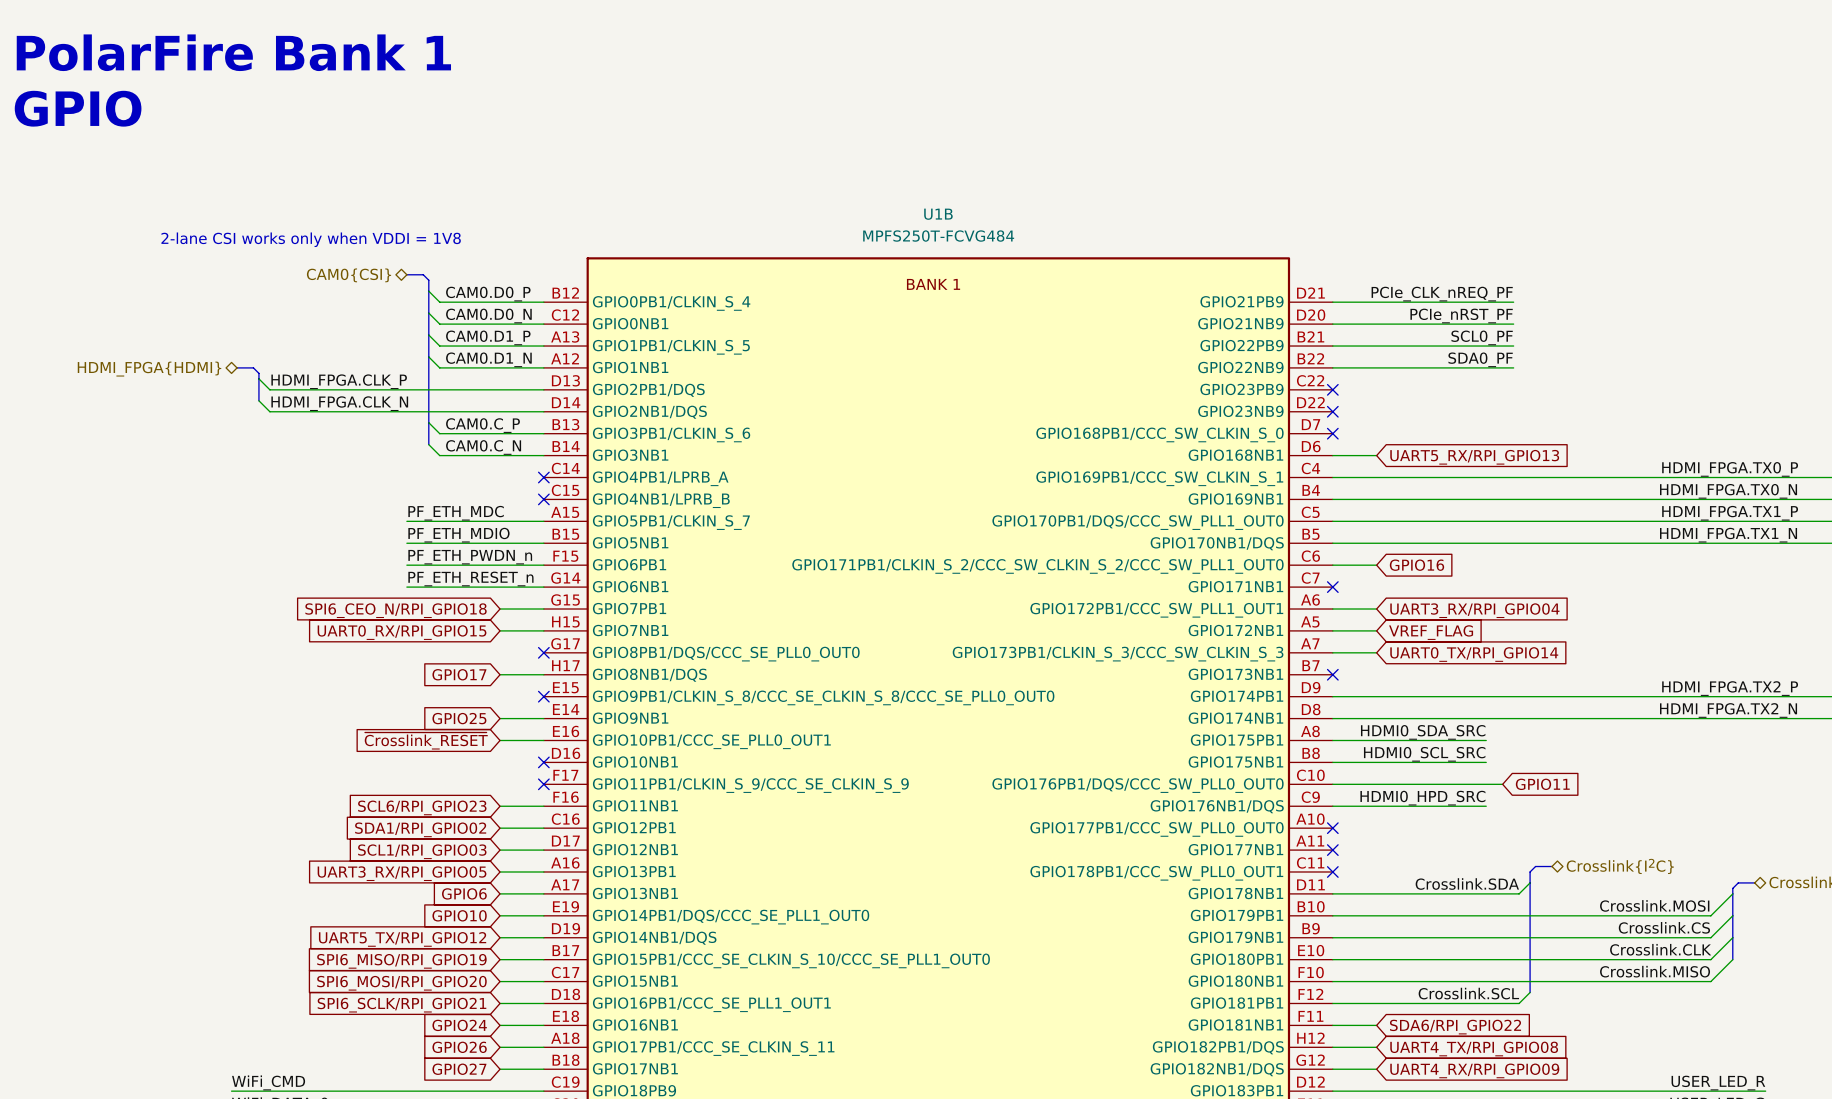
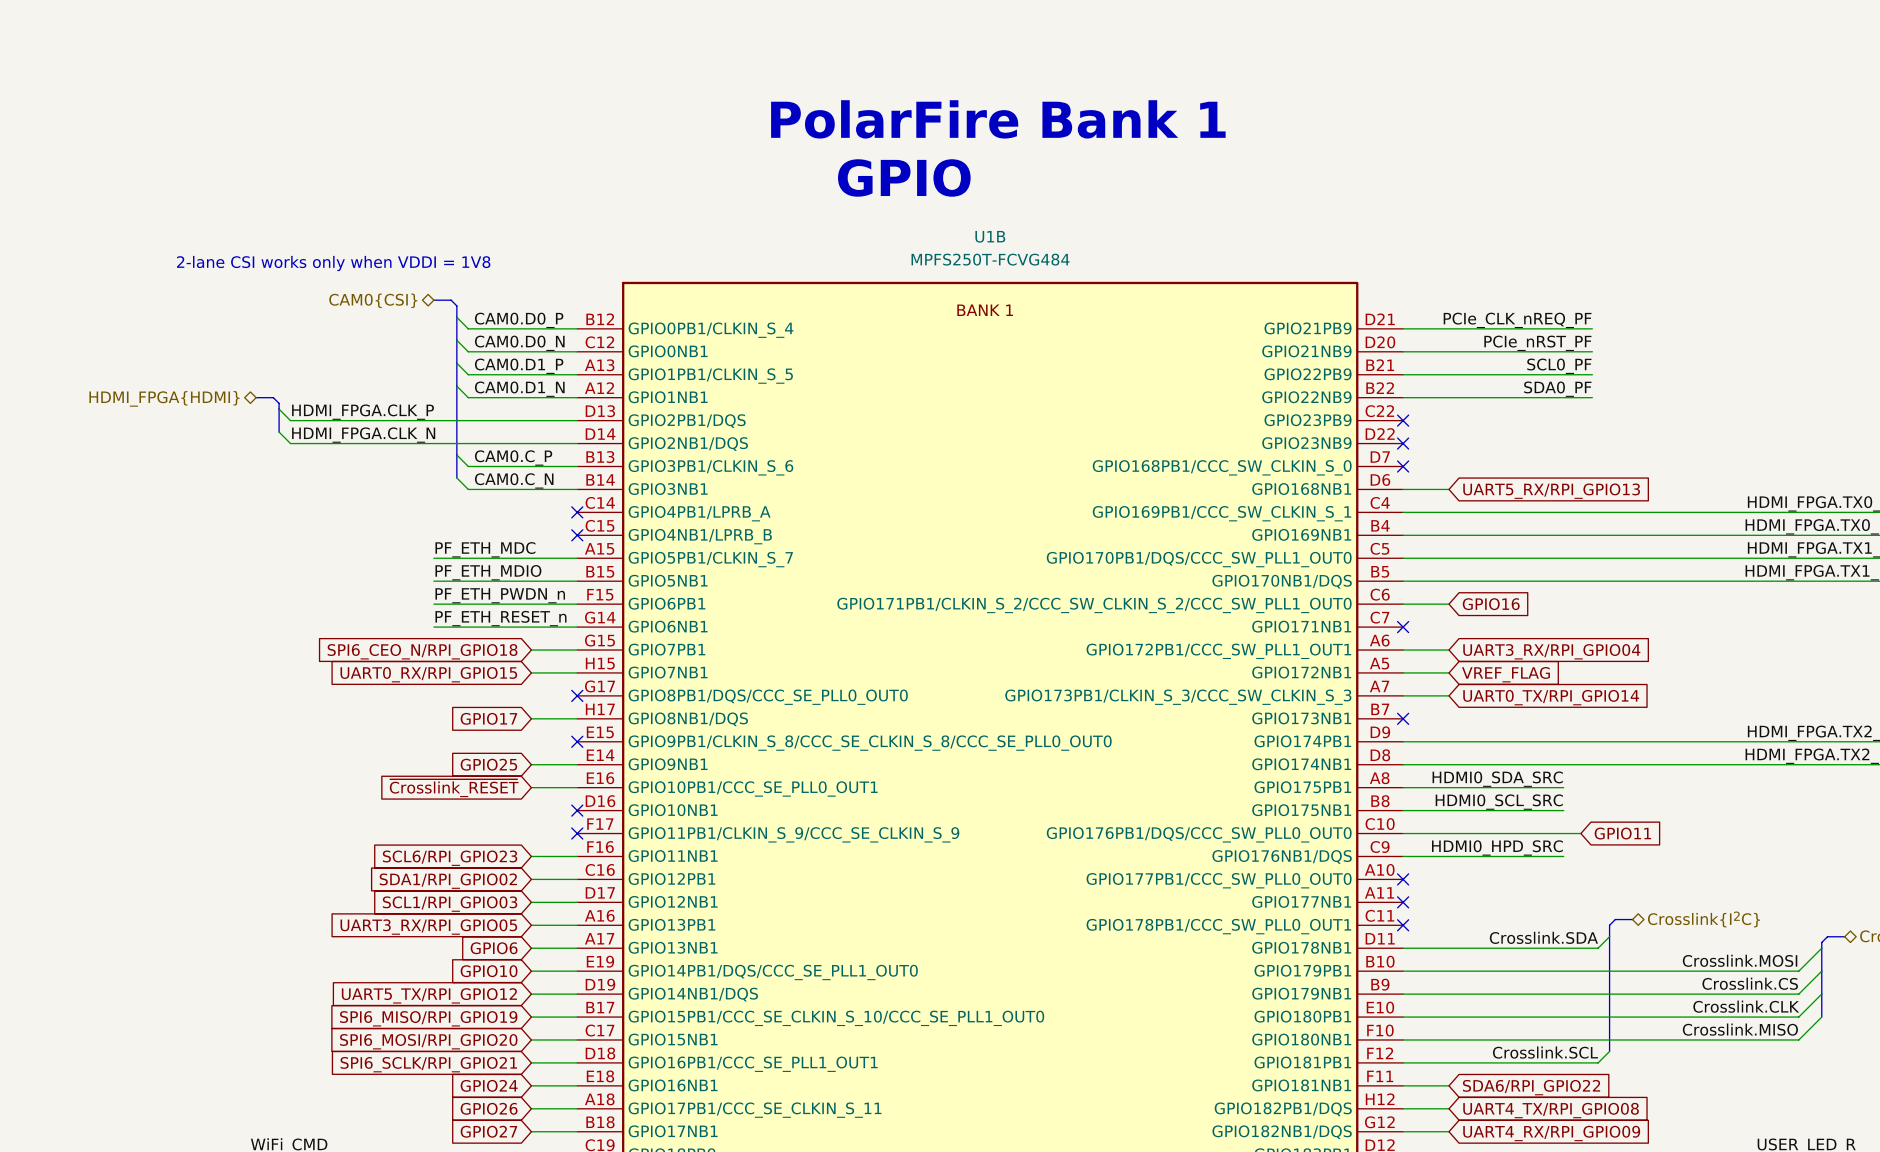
text: PolarFire Bank 1 (233, 52) -> none
text: none -> PolarFire Bank 1 (998, 119)
text: GPIO (78, 108) -> none
text: none -> GPIO (904, 177)

